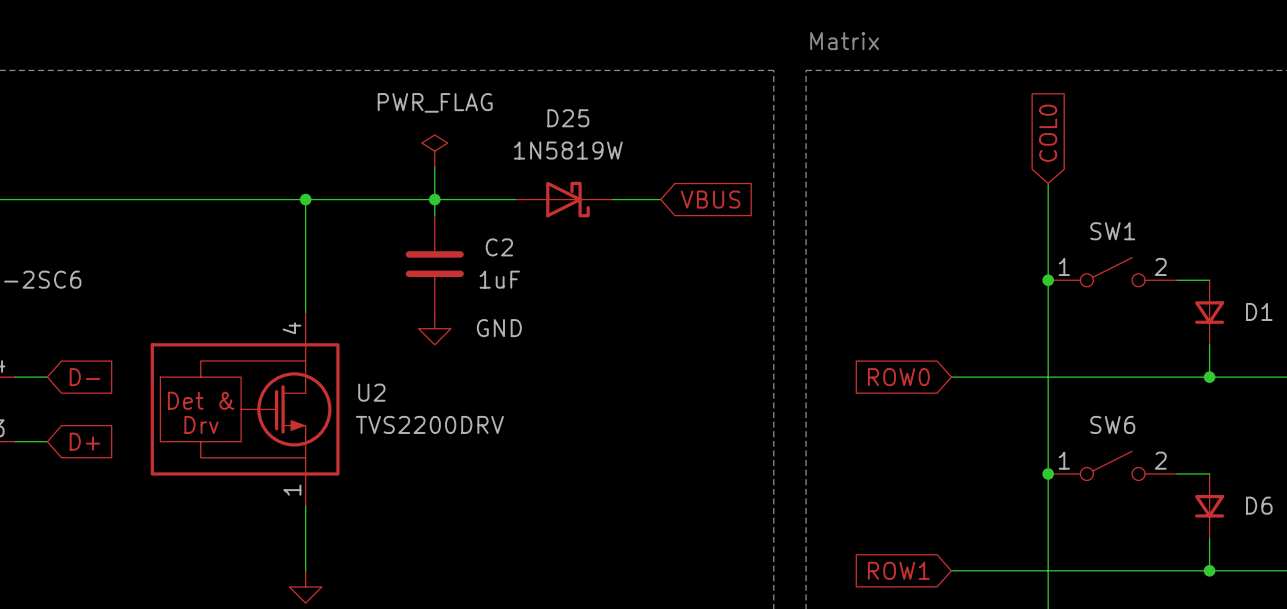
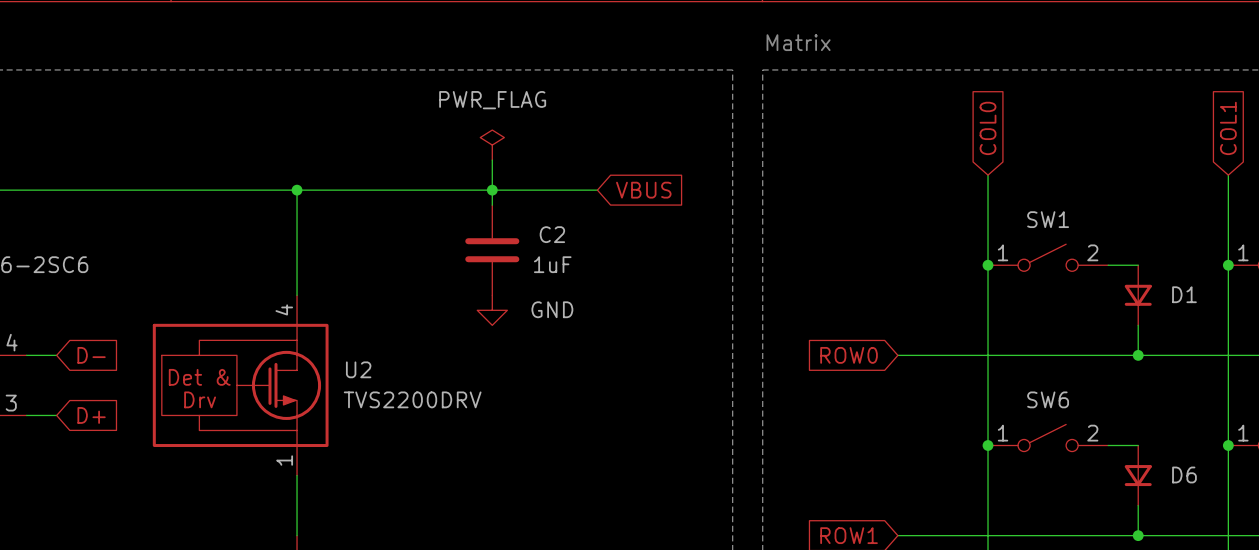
power symbol position: PWR_FLAG (434, 151) -> PWR_FLAG (492, 145)
wire: (434, 167) (434, 215) -> (492, 160) (492, 205)
junction: (434, 199) -> none
junction: none -> (492, 190)
D25: 1N5819W (563, 199) -> none
wire: (628, 199) (660, 199) -> none
global label position: VBUS (710, 199) -> VBUS (643, 190)
C2 position: (434, 264) -> (492, 250)
power symbol position: GND (434, 328) -> GND (492, 310)

